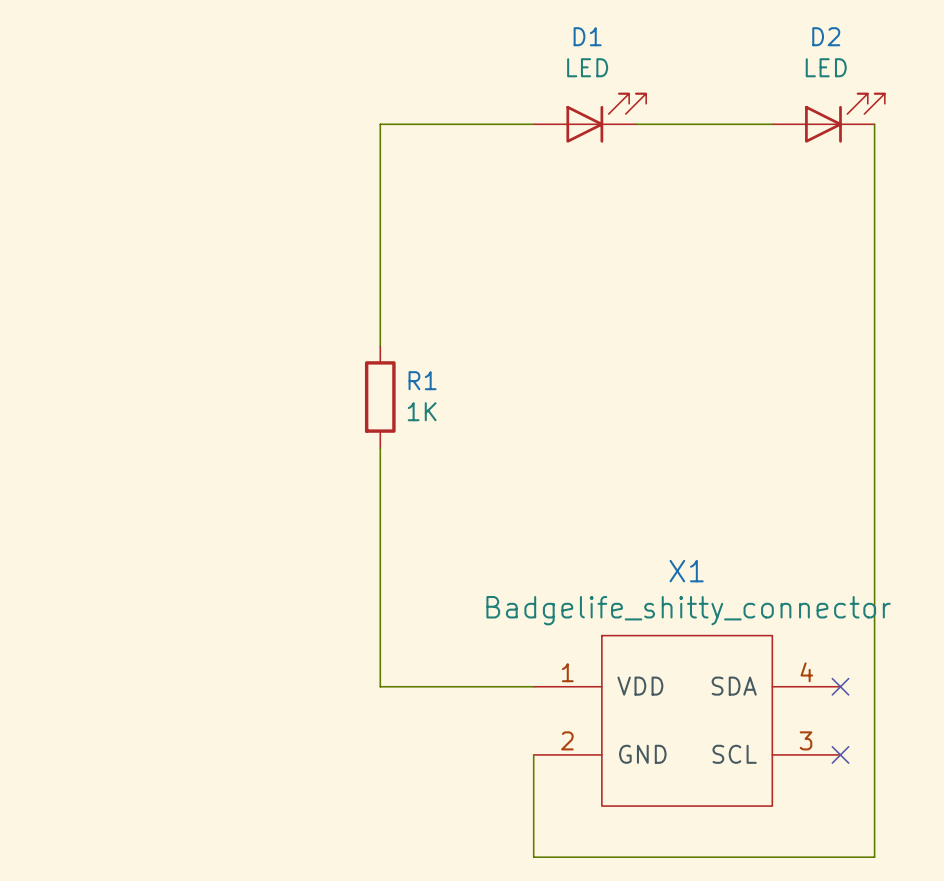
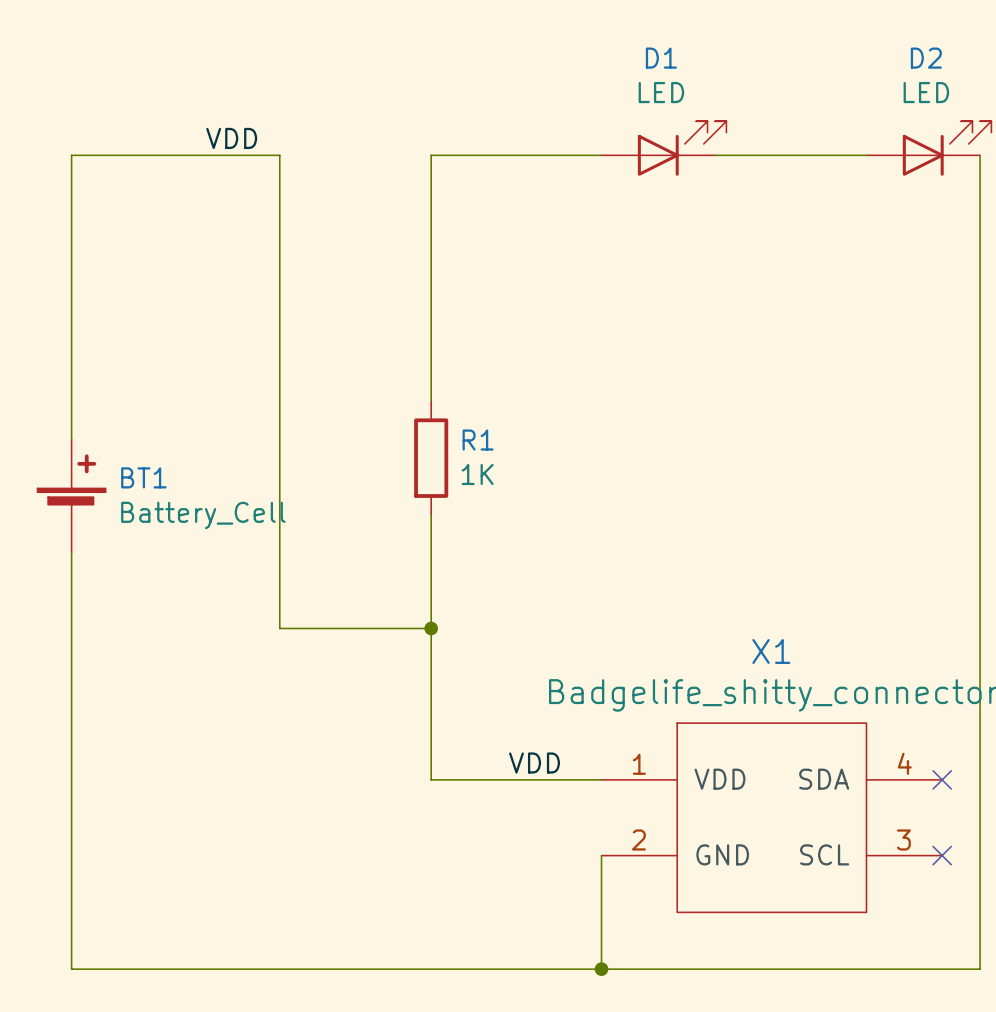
label: none -> VDD (231, 138)
wire: none -> (71, 439) (71, 155) (279, 155) (279, 628) (431, 628)
BT1: none -> Battery_Cell (71, 496)
wire: none -> (71, 552) (71, 969) (601, 969)
junction: none -> (431, 628)
label: none -> VDD (534, 763)
junction: none -> (601, 969)

